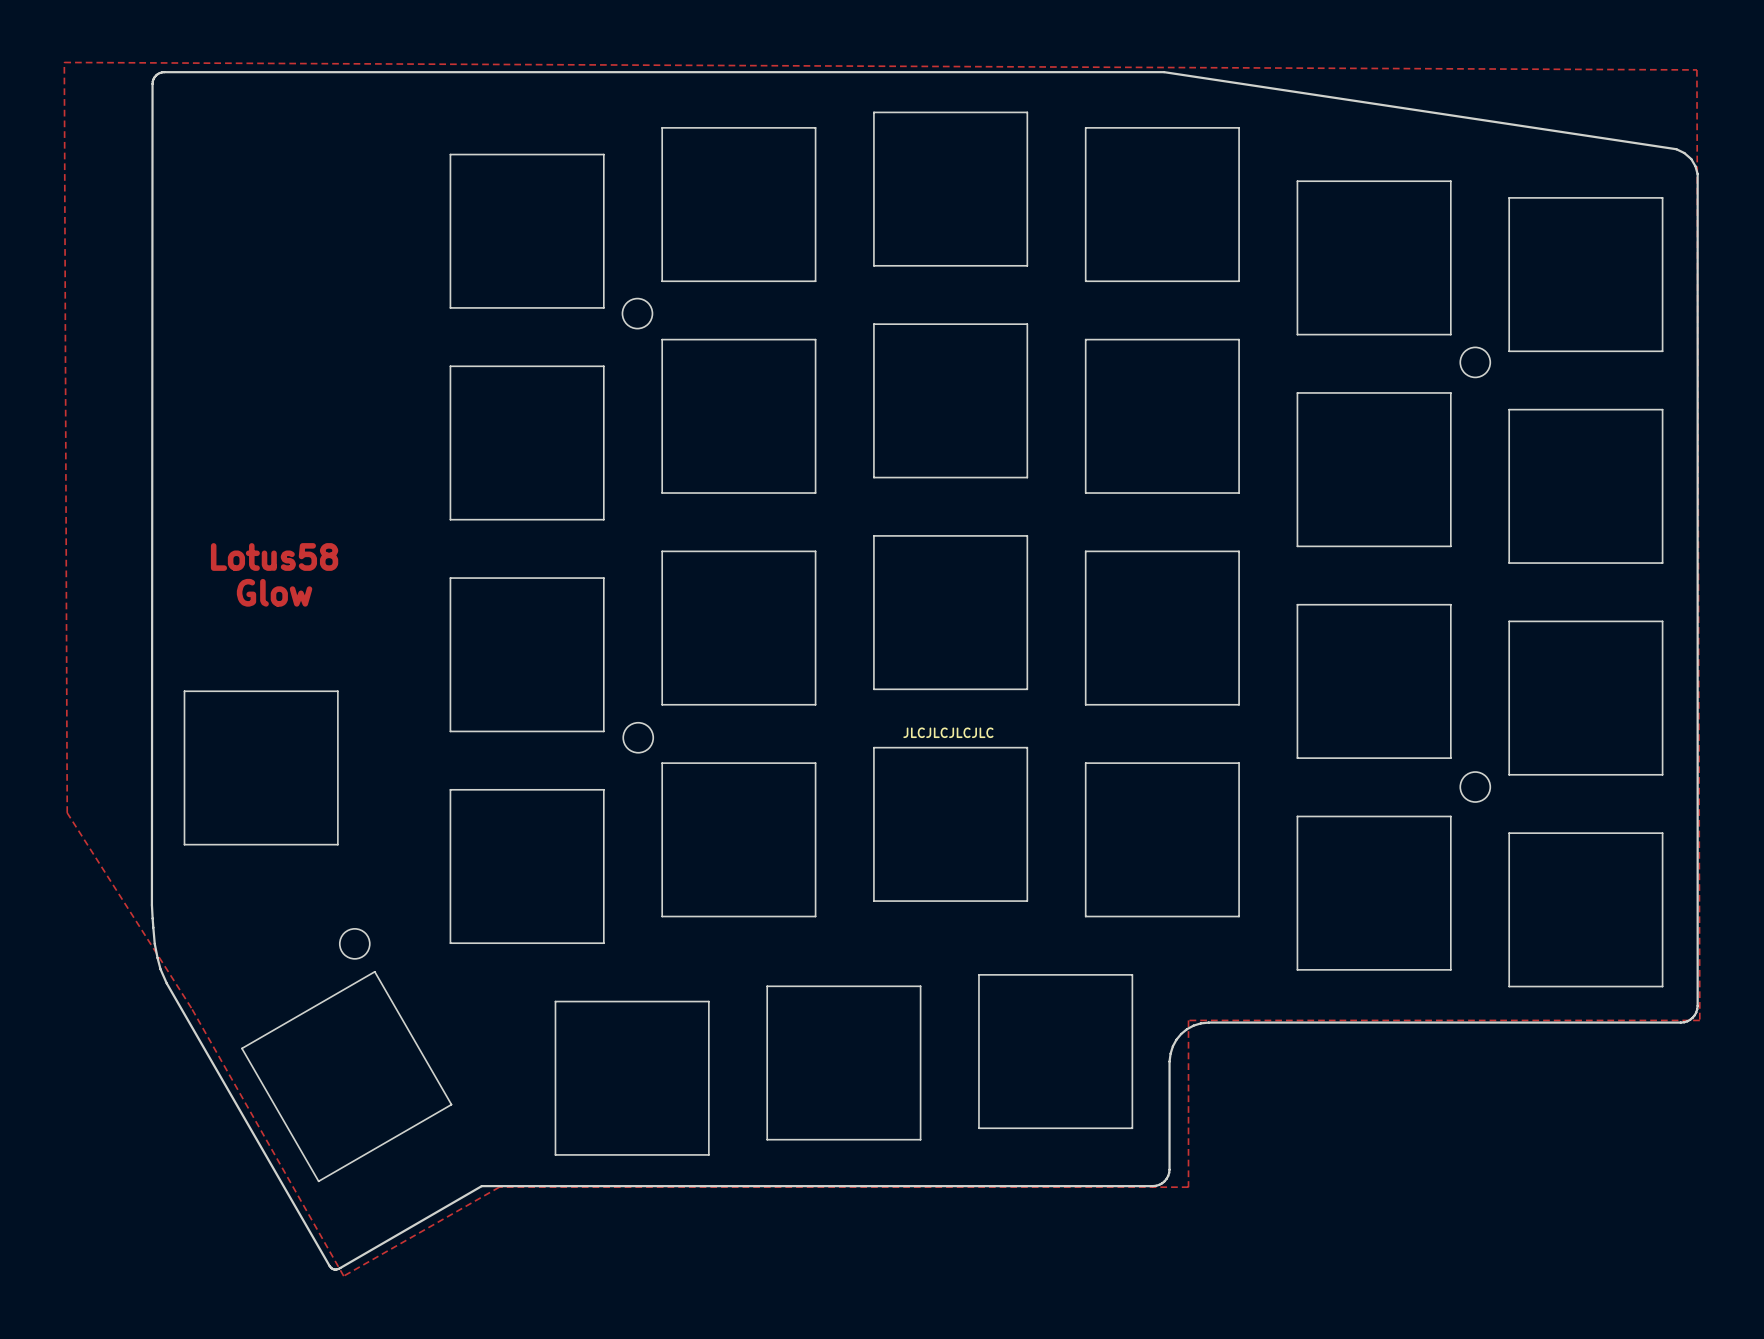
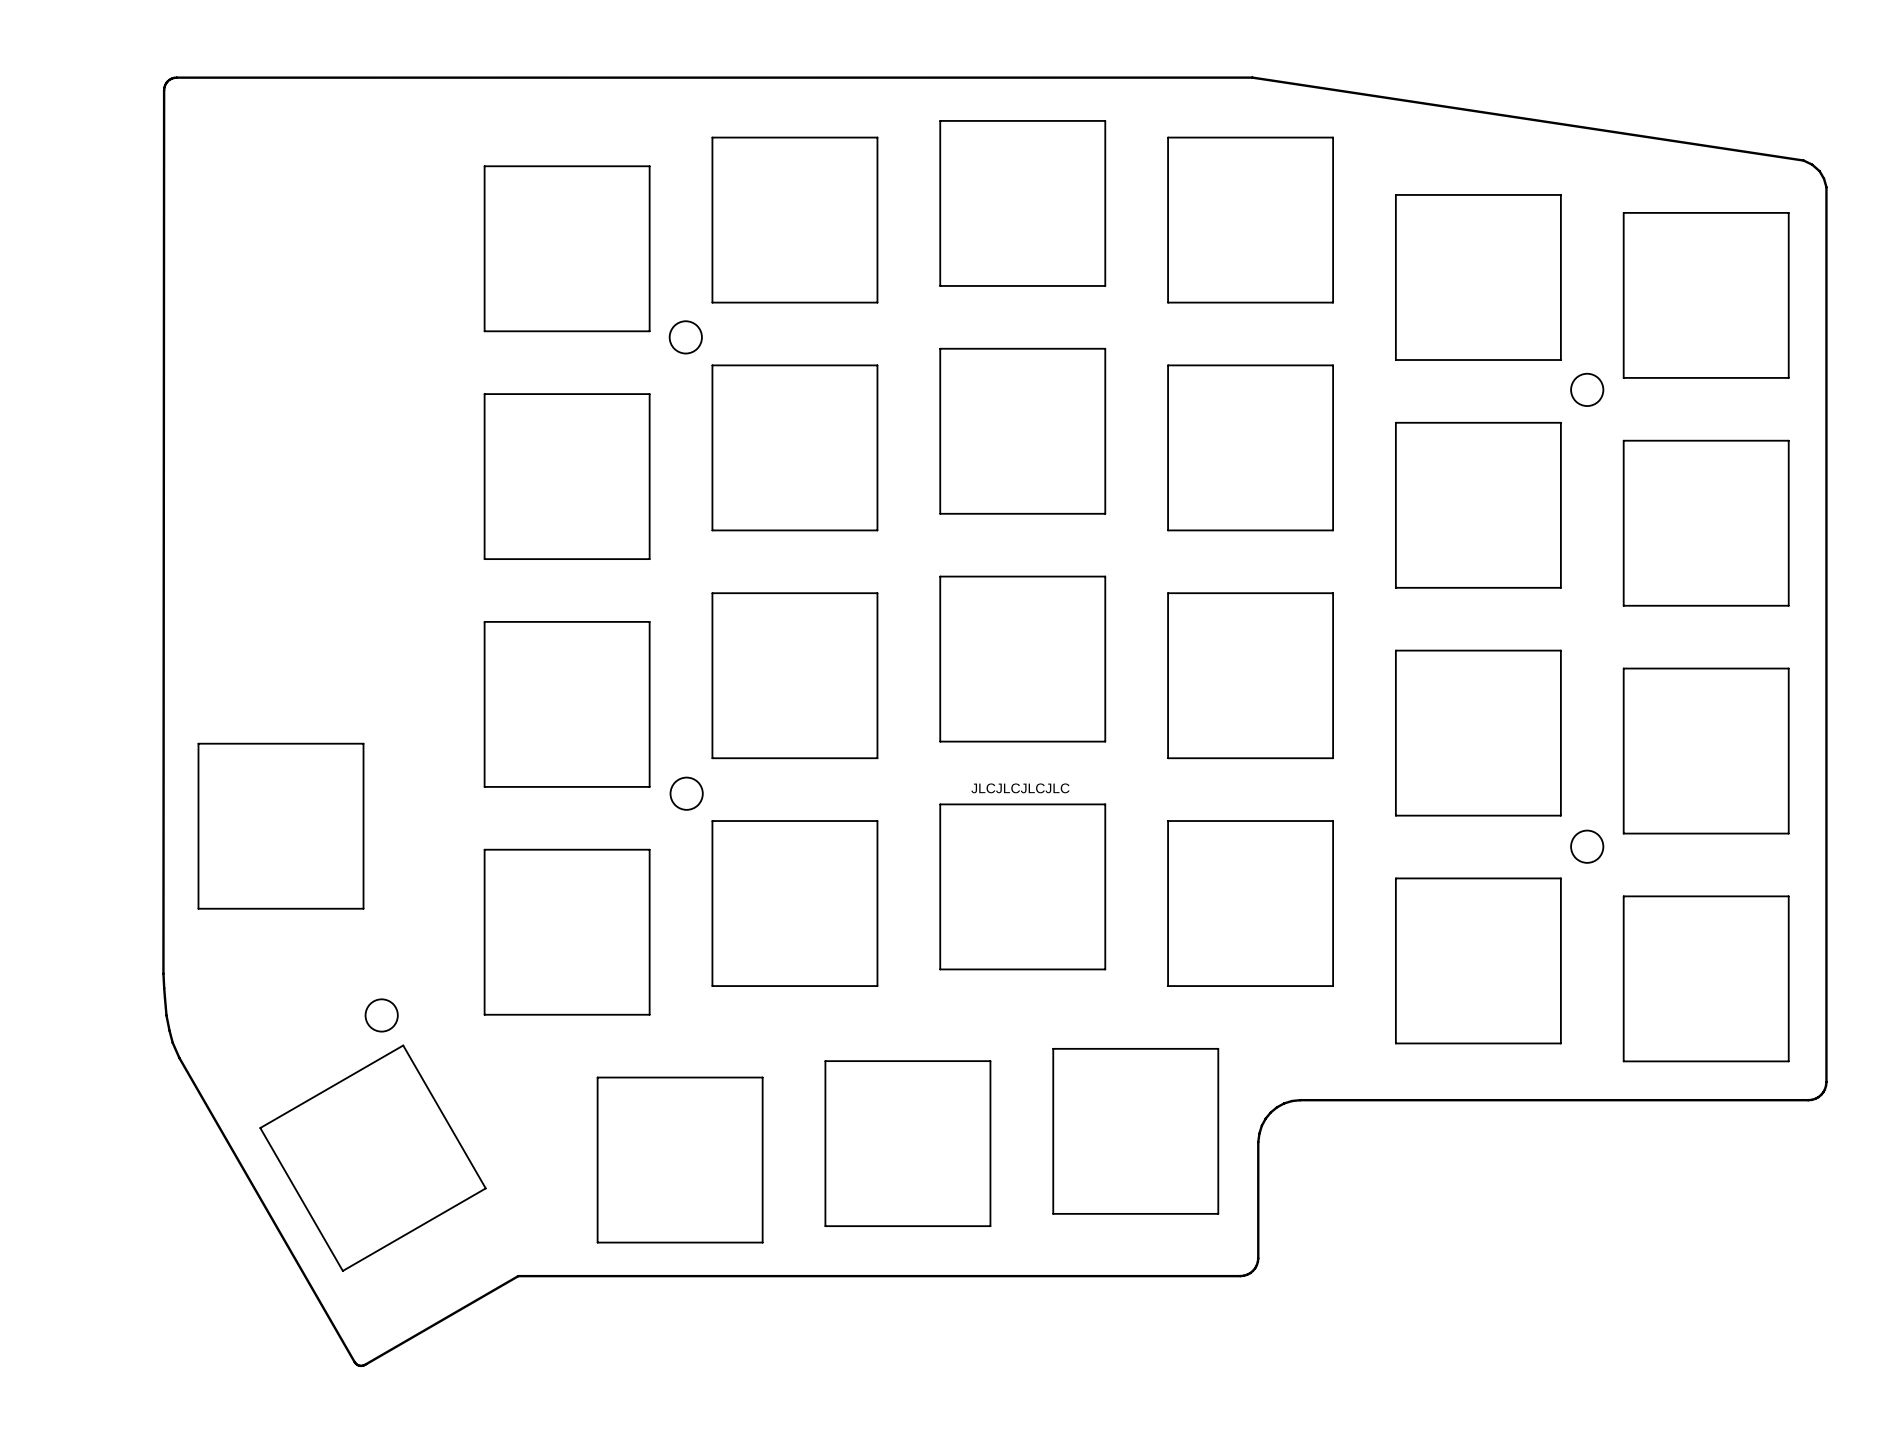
zone outline: (64, 62) (1696, 69) (1699, 1020) (1188, 1020) (1188, 1187) (499, 1187) (343, 1276) (191, 1008) (67, 812) (64, 62) -> none
text: Lotus58 (274, 556) -> none
text: Glow (274, 592) -> none

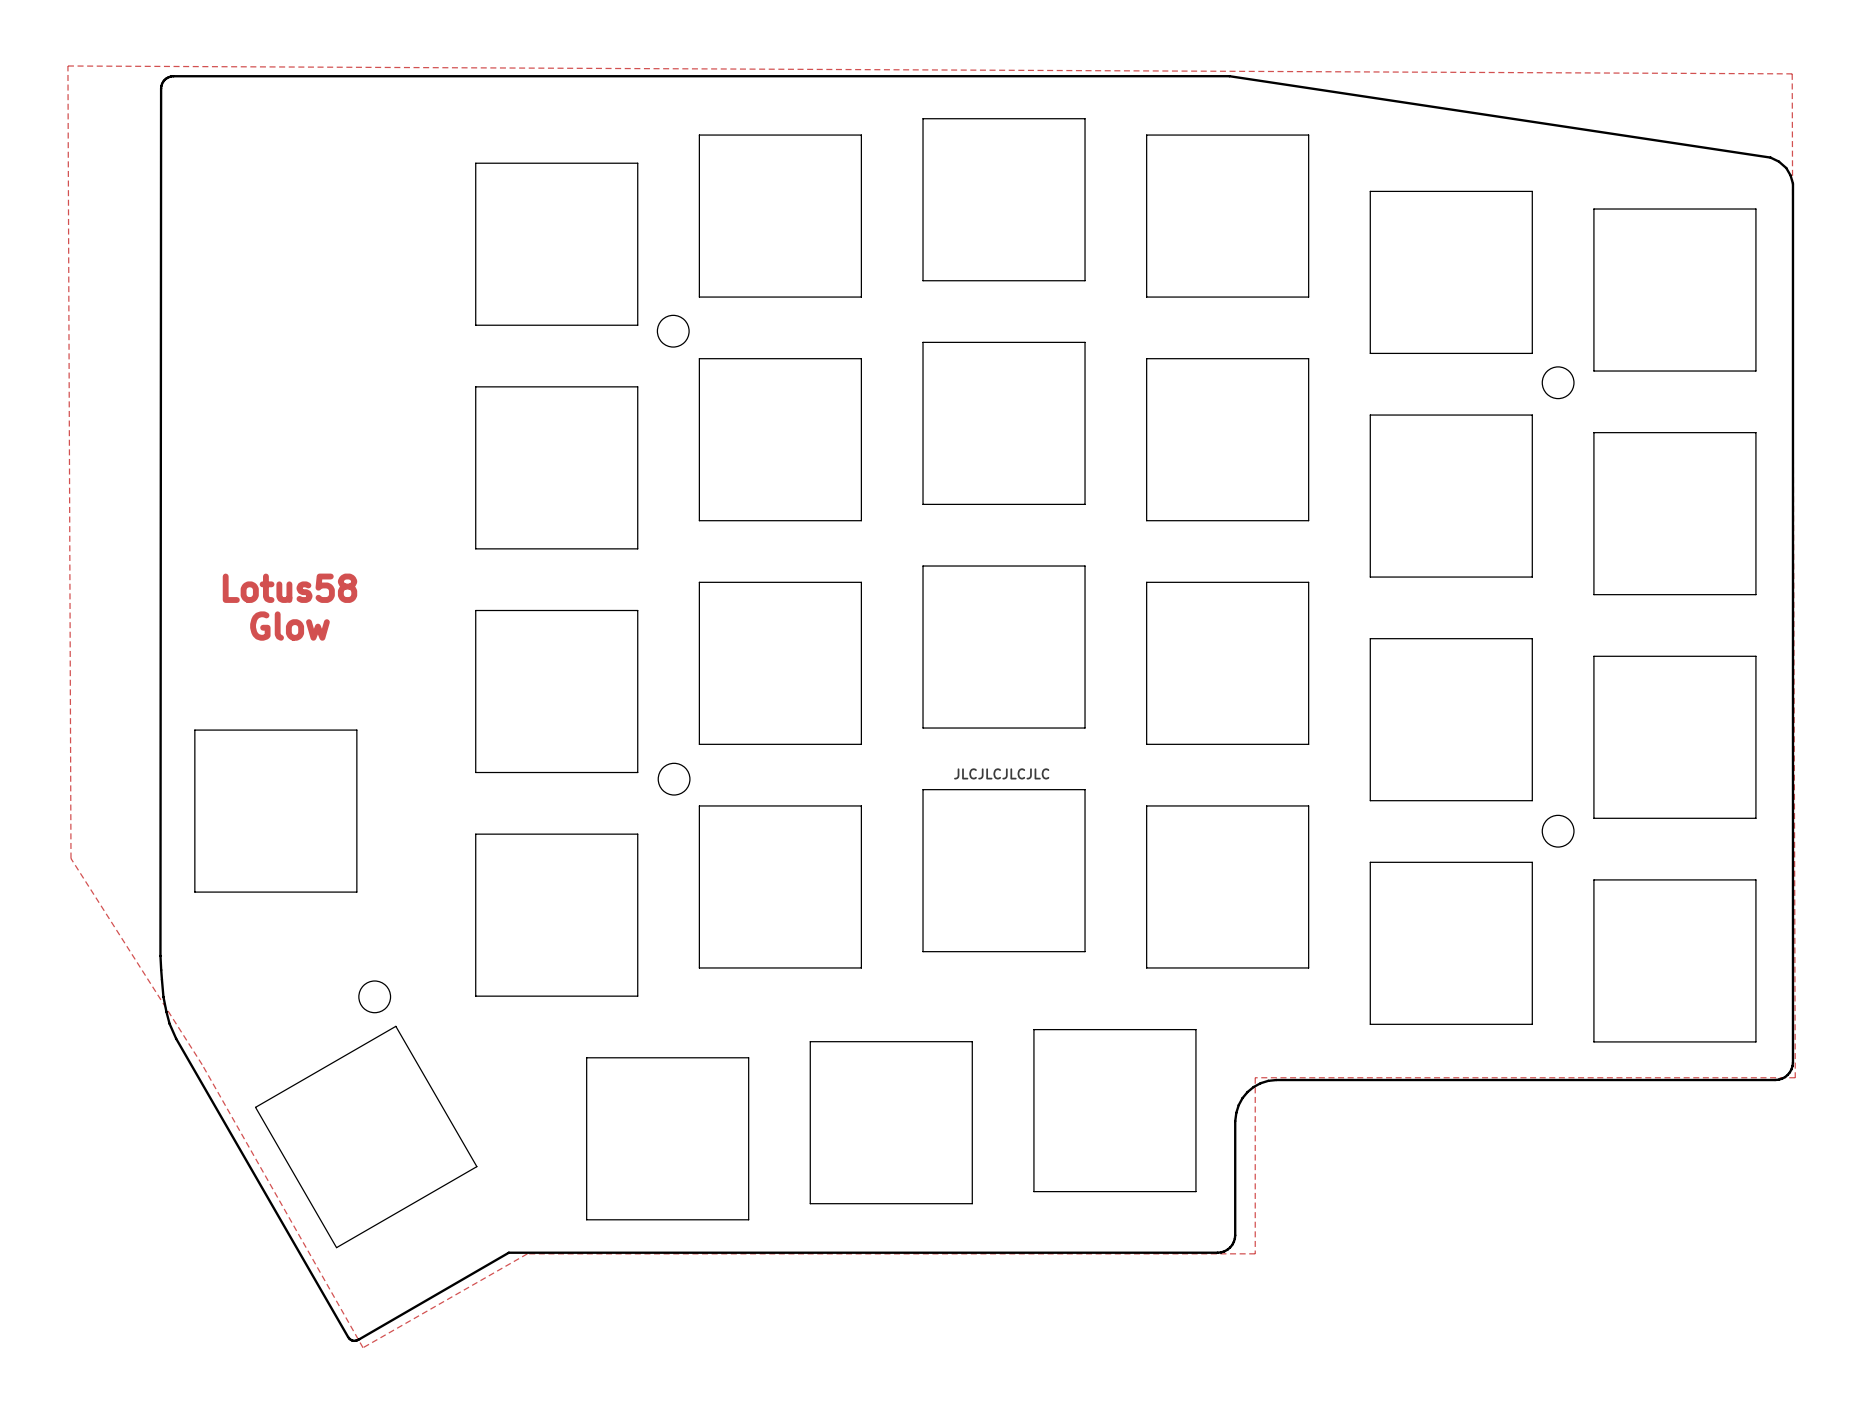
zone outline: none -> (67, 65) (1792, 73) (1795, 1077) (1255, 1077) (1255, 1253) (527, 1253) (363, 1347) (202, 1064) (71, 858) (67, 65)
text: none -> Lotus58 (289, 588)
text: none -> Glow (289, 626)

